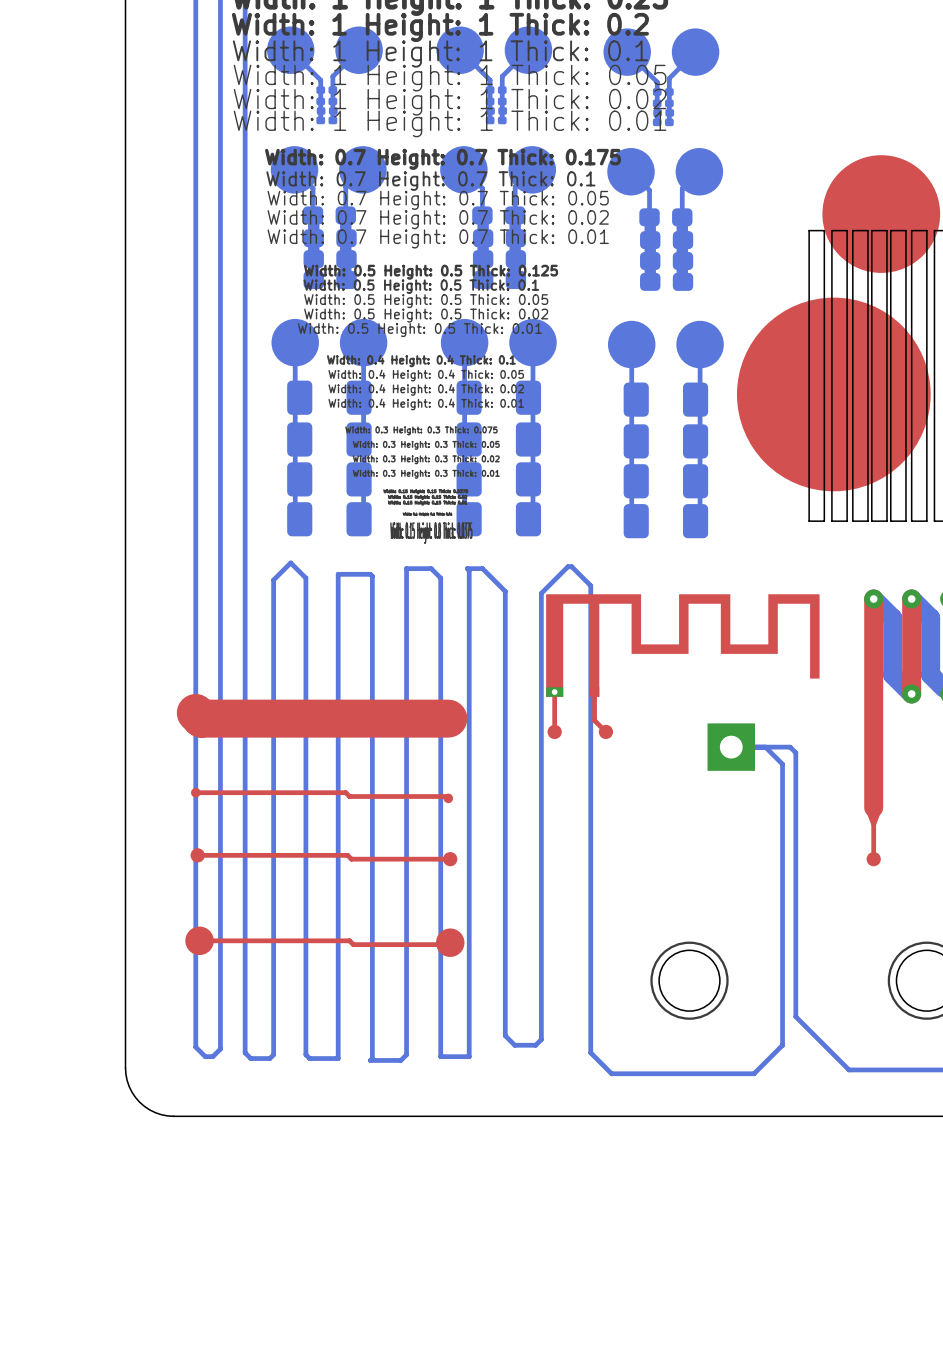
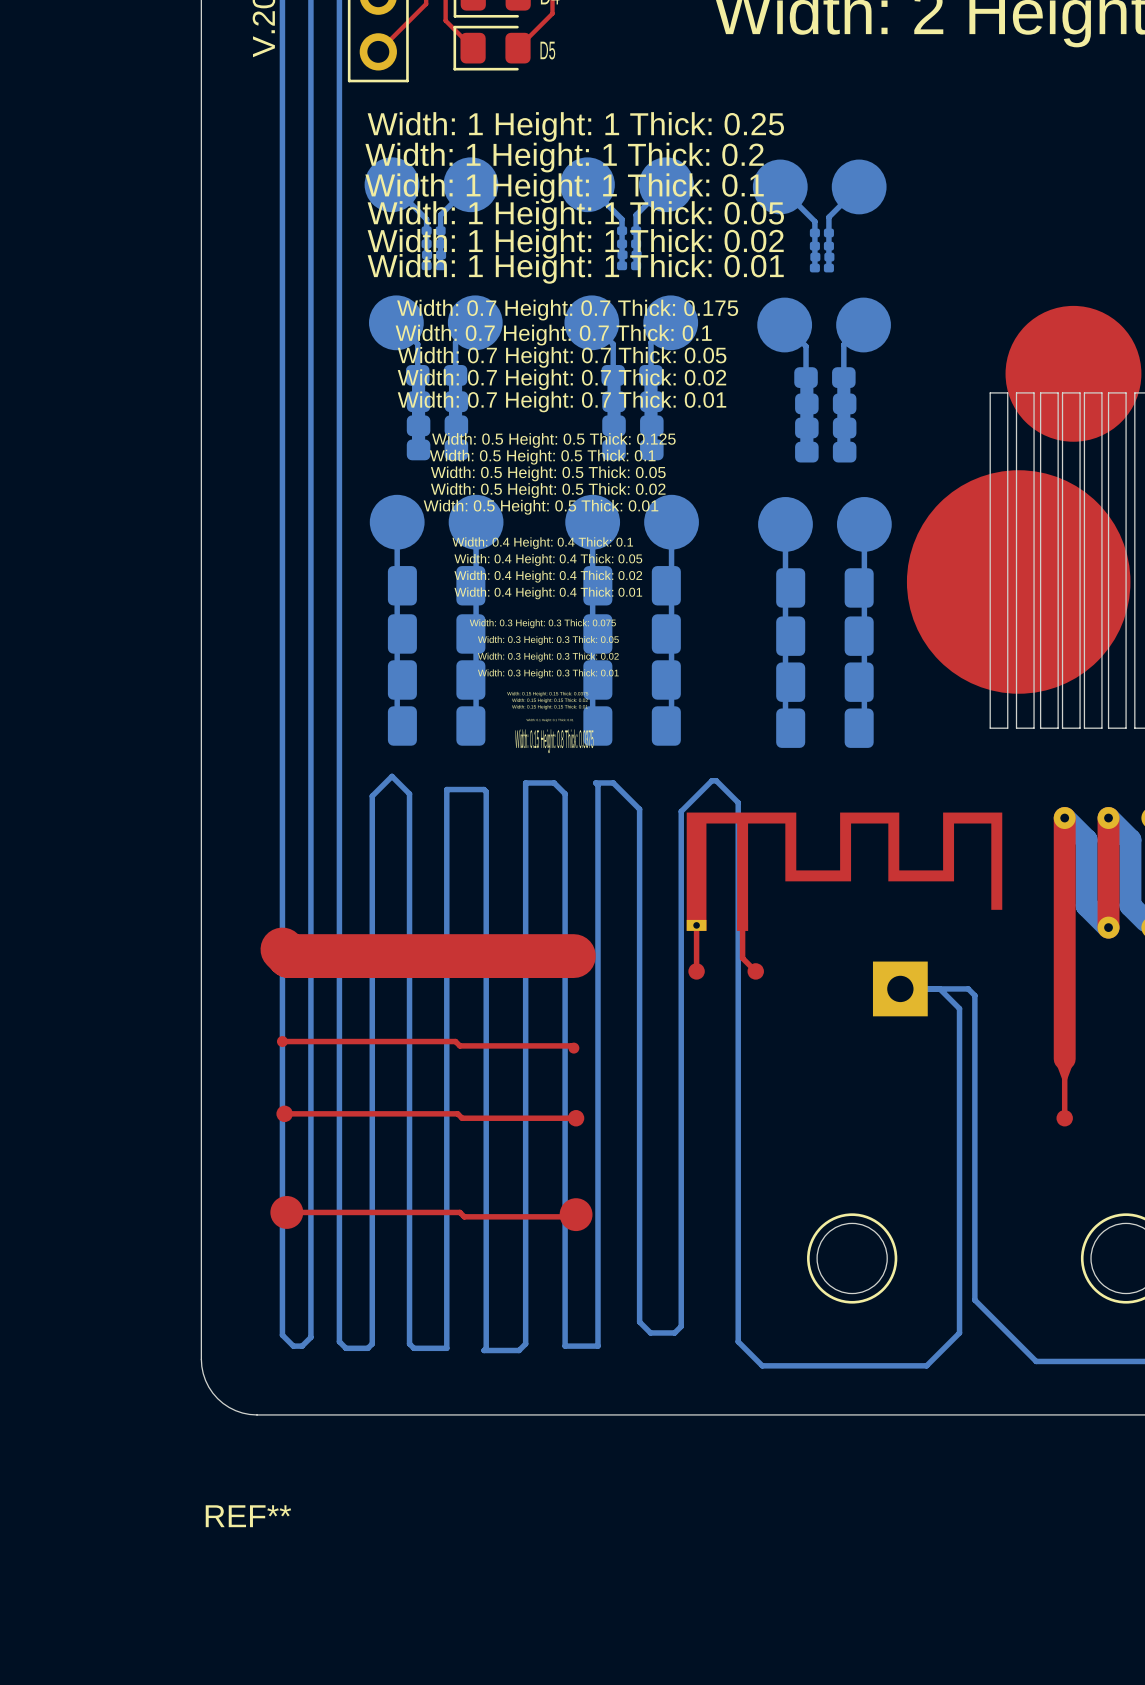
REF** name: none -> REF** (248, 1516)

